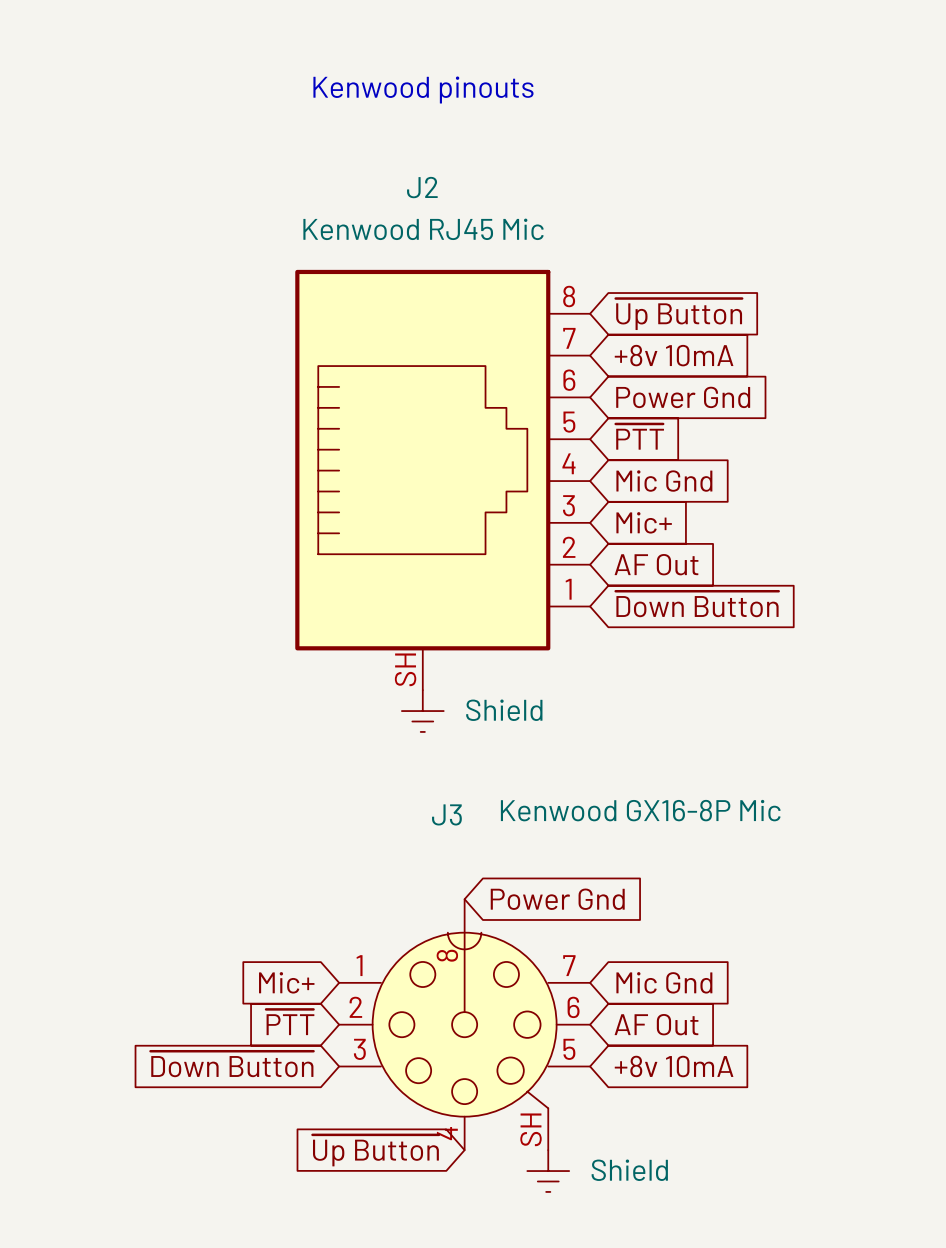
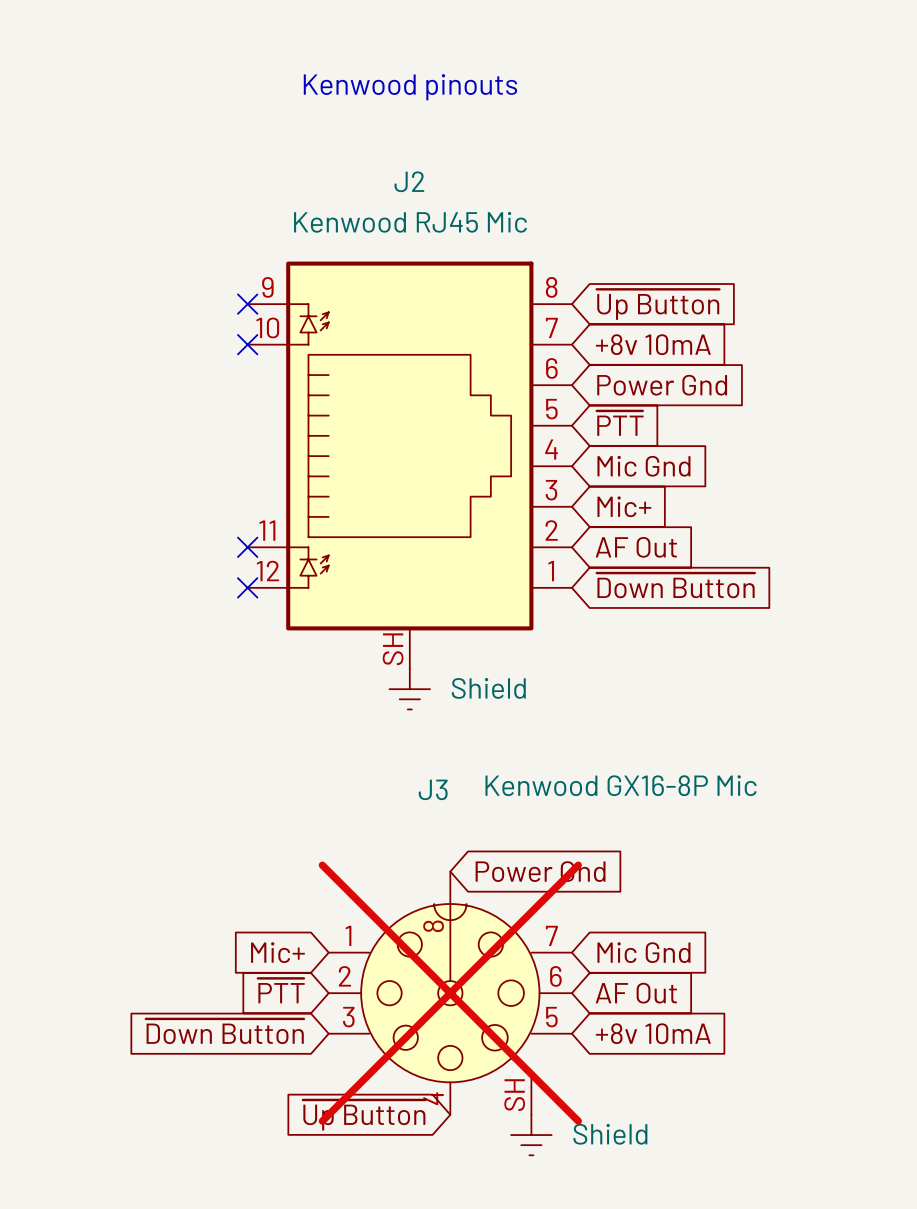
J2 symbol: [295, 269, 591, 691] -> [247, 261, 572, 669]
no-connect mark: none -> (247, 304)
no-connect mark: none -> (247, 344)
no-connect mark: none -> (247, 547)
no-connect mark: none -> (247, 587)
J3 do-not-place cross: none -> (450, 993)

